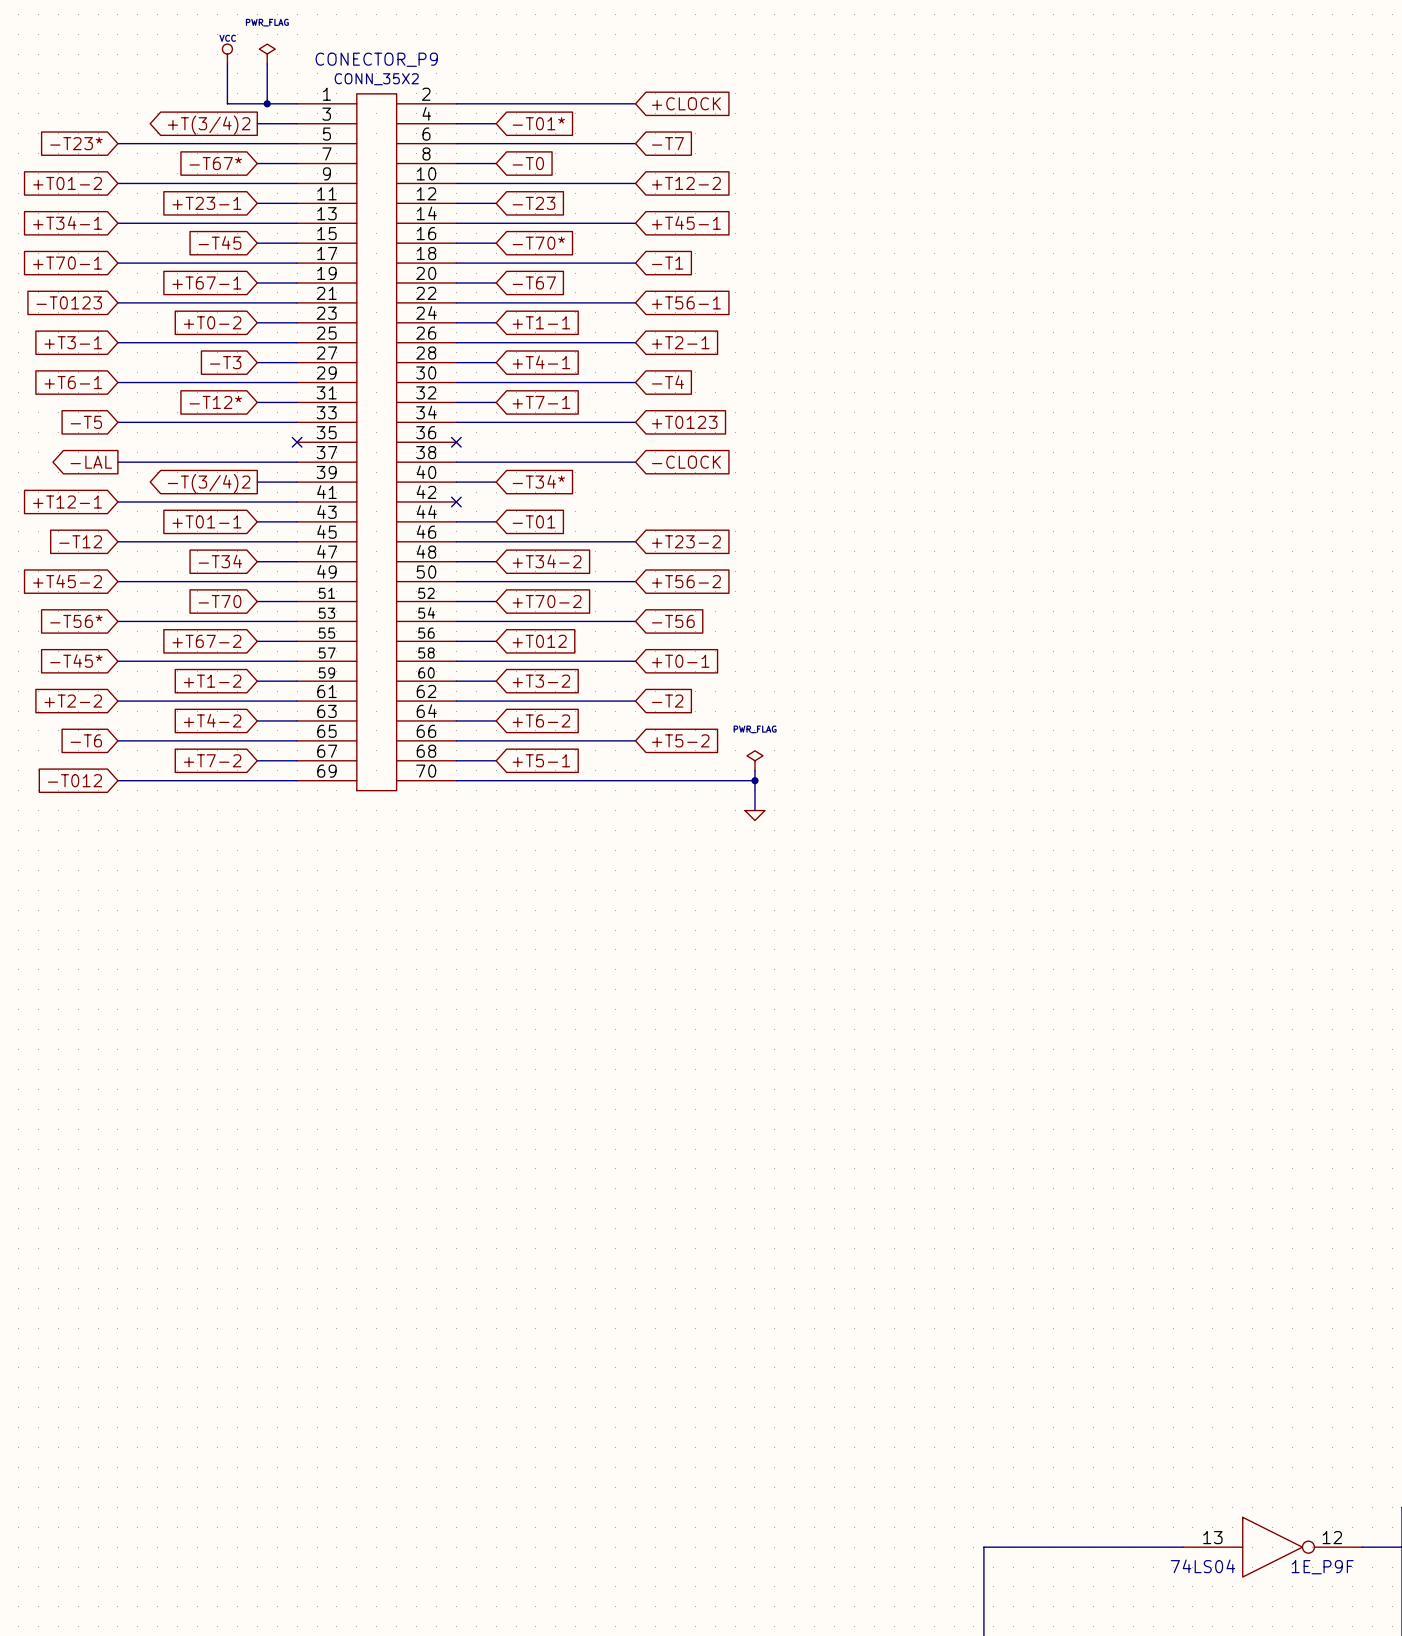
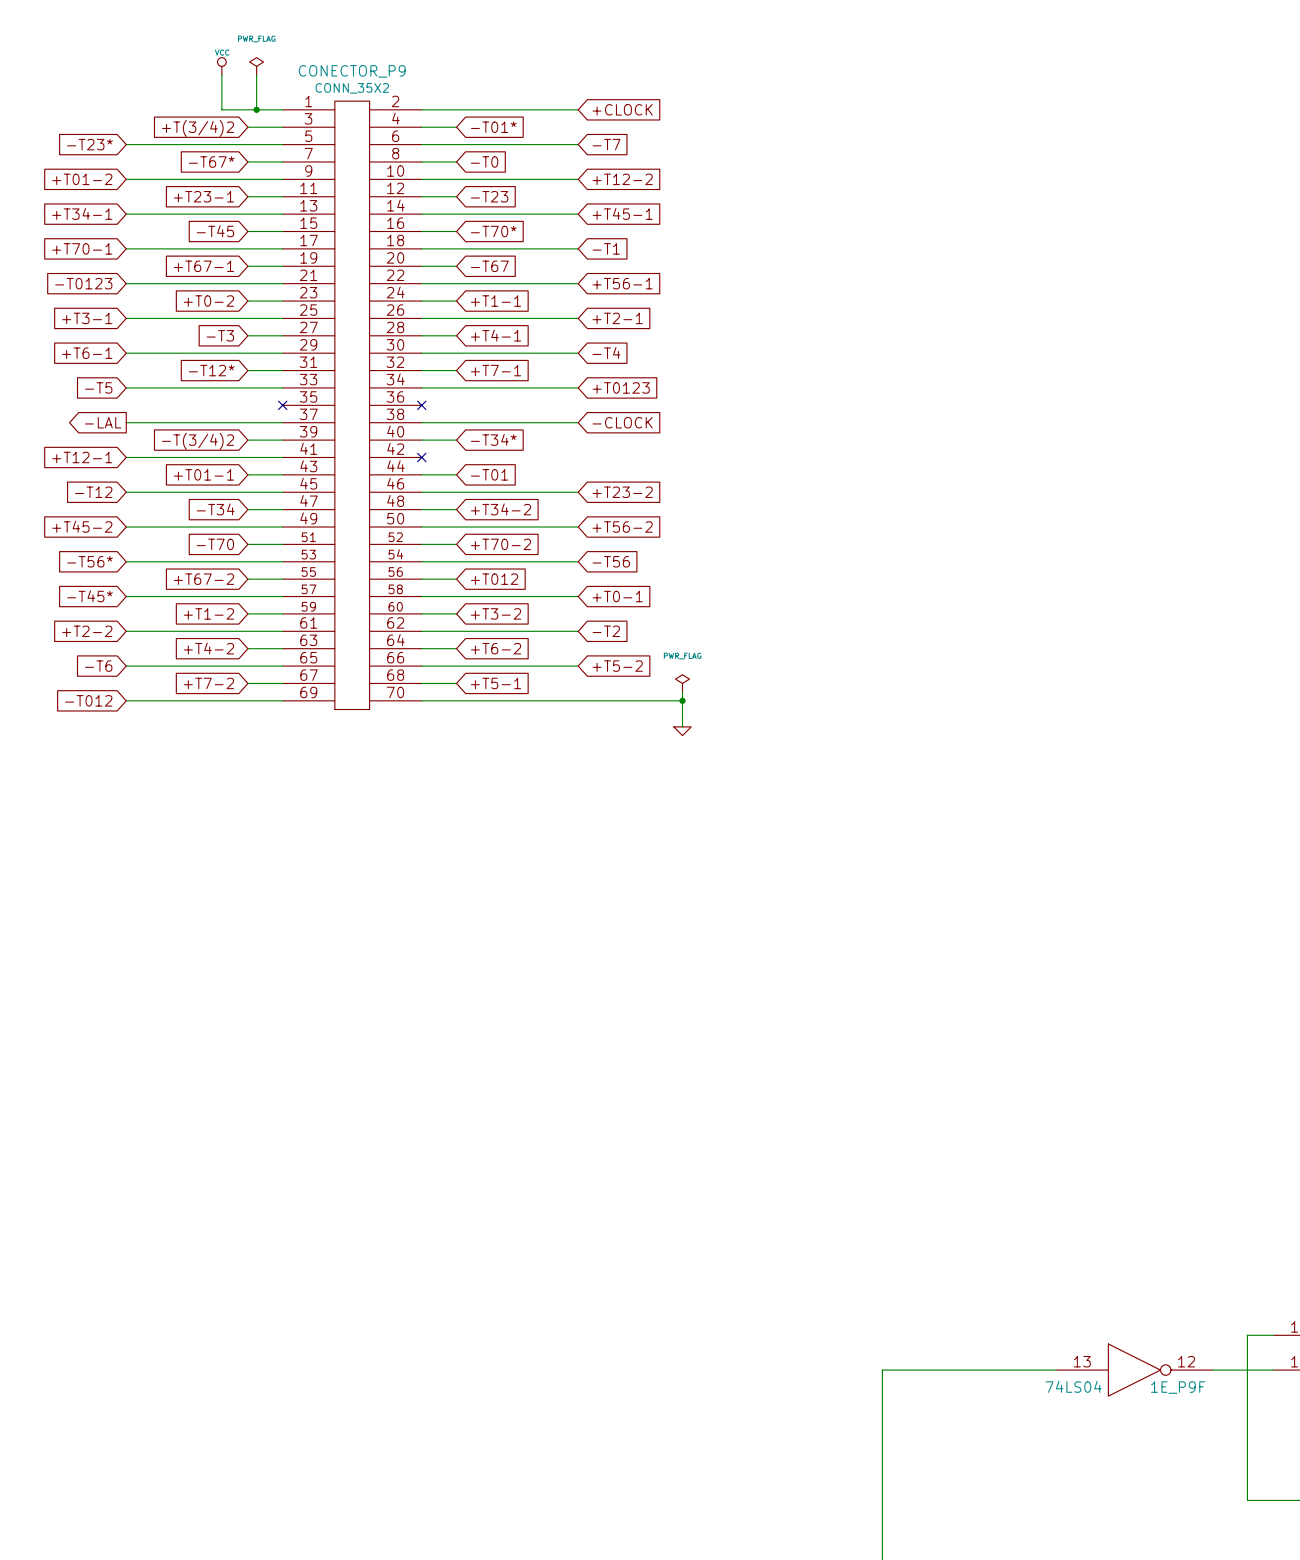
global label shape: output (209, 125) -> input (198, 128)
global label shape: output (209, 483) -> input (198, 441)

